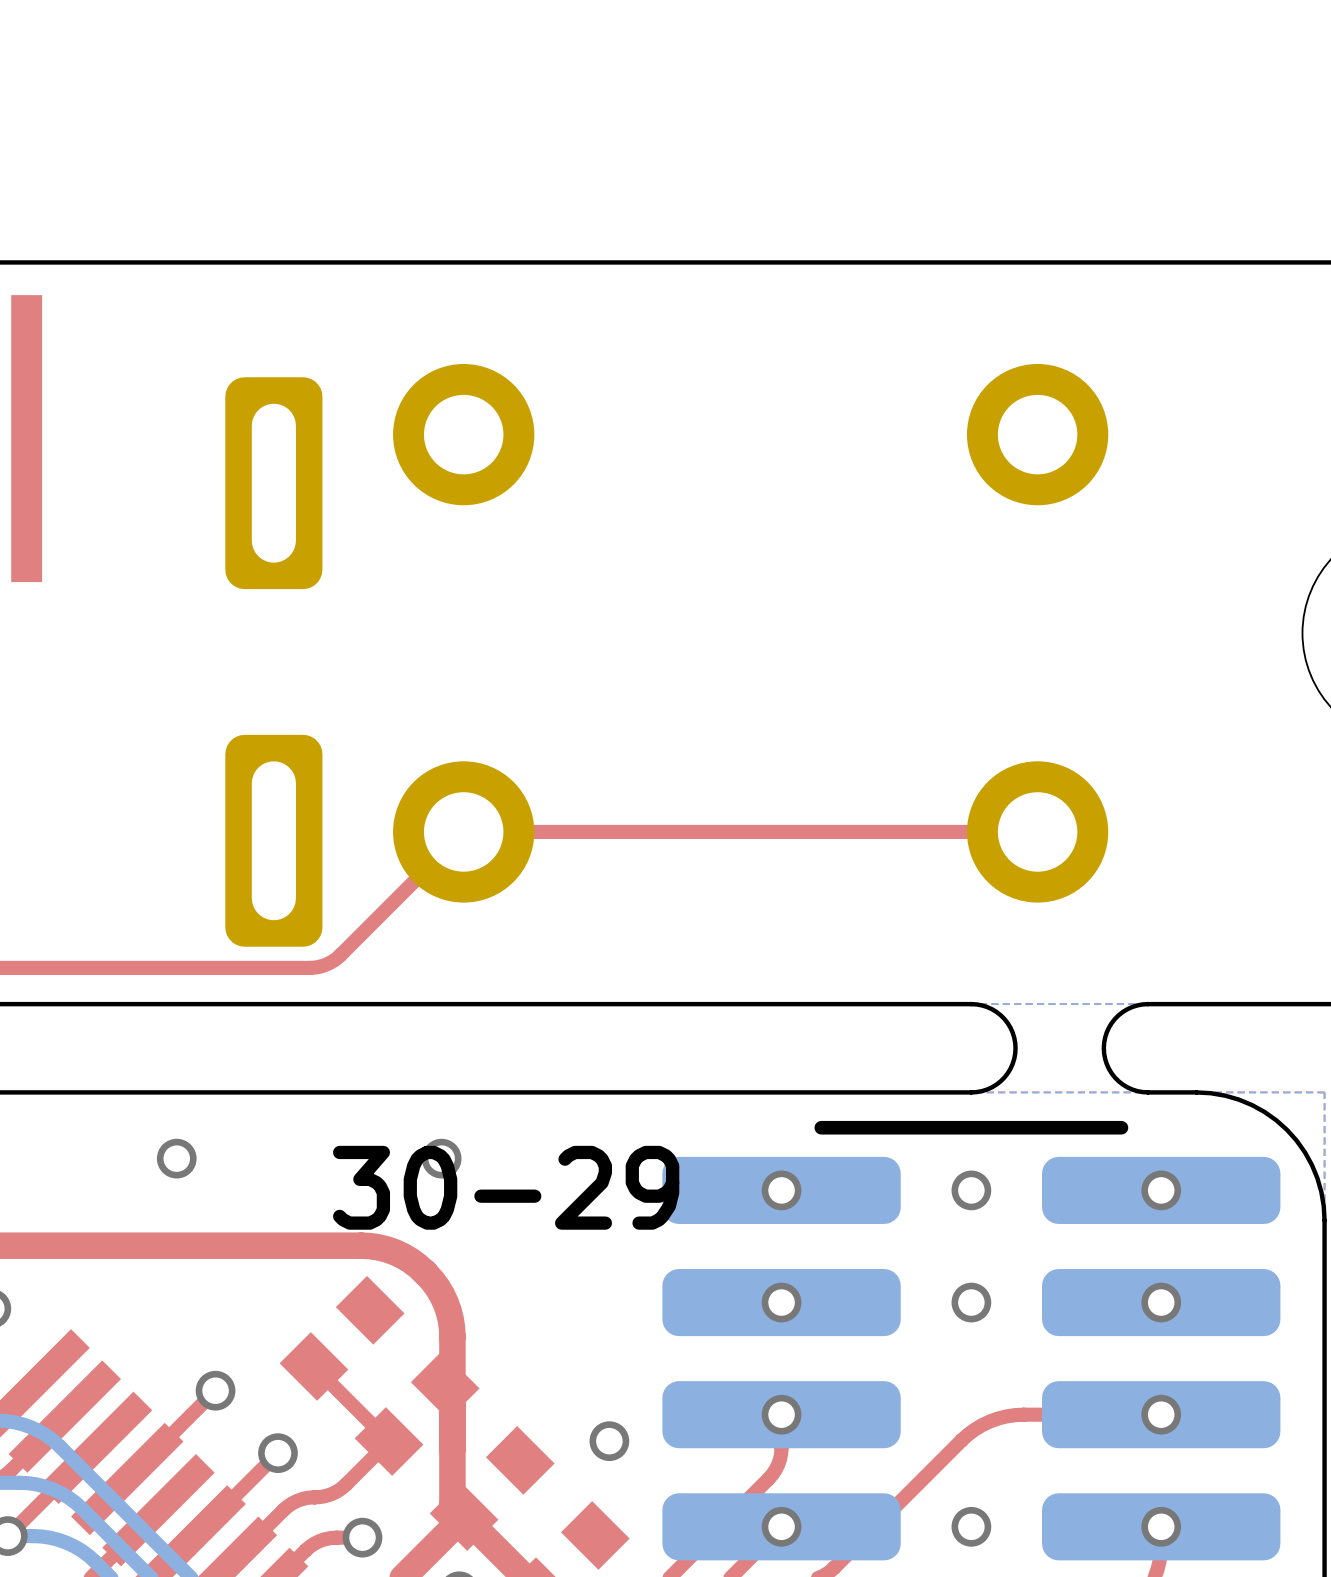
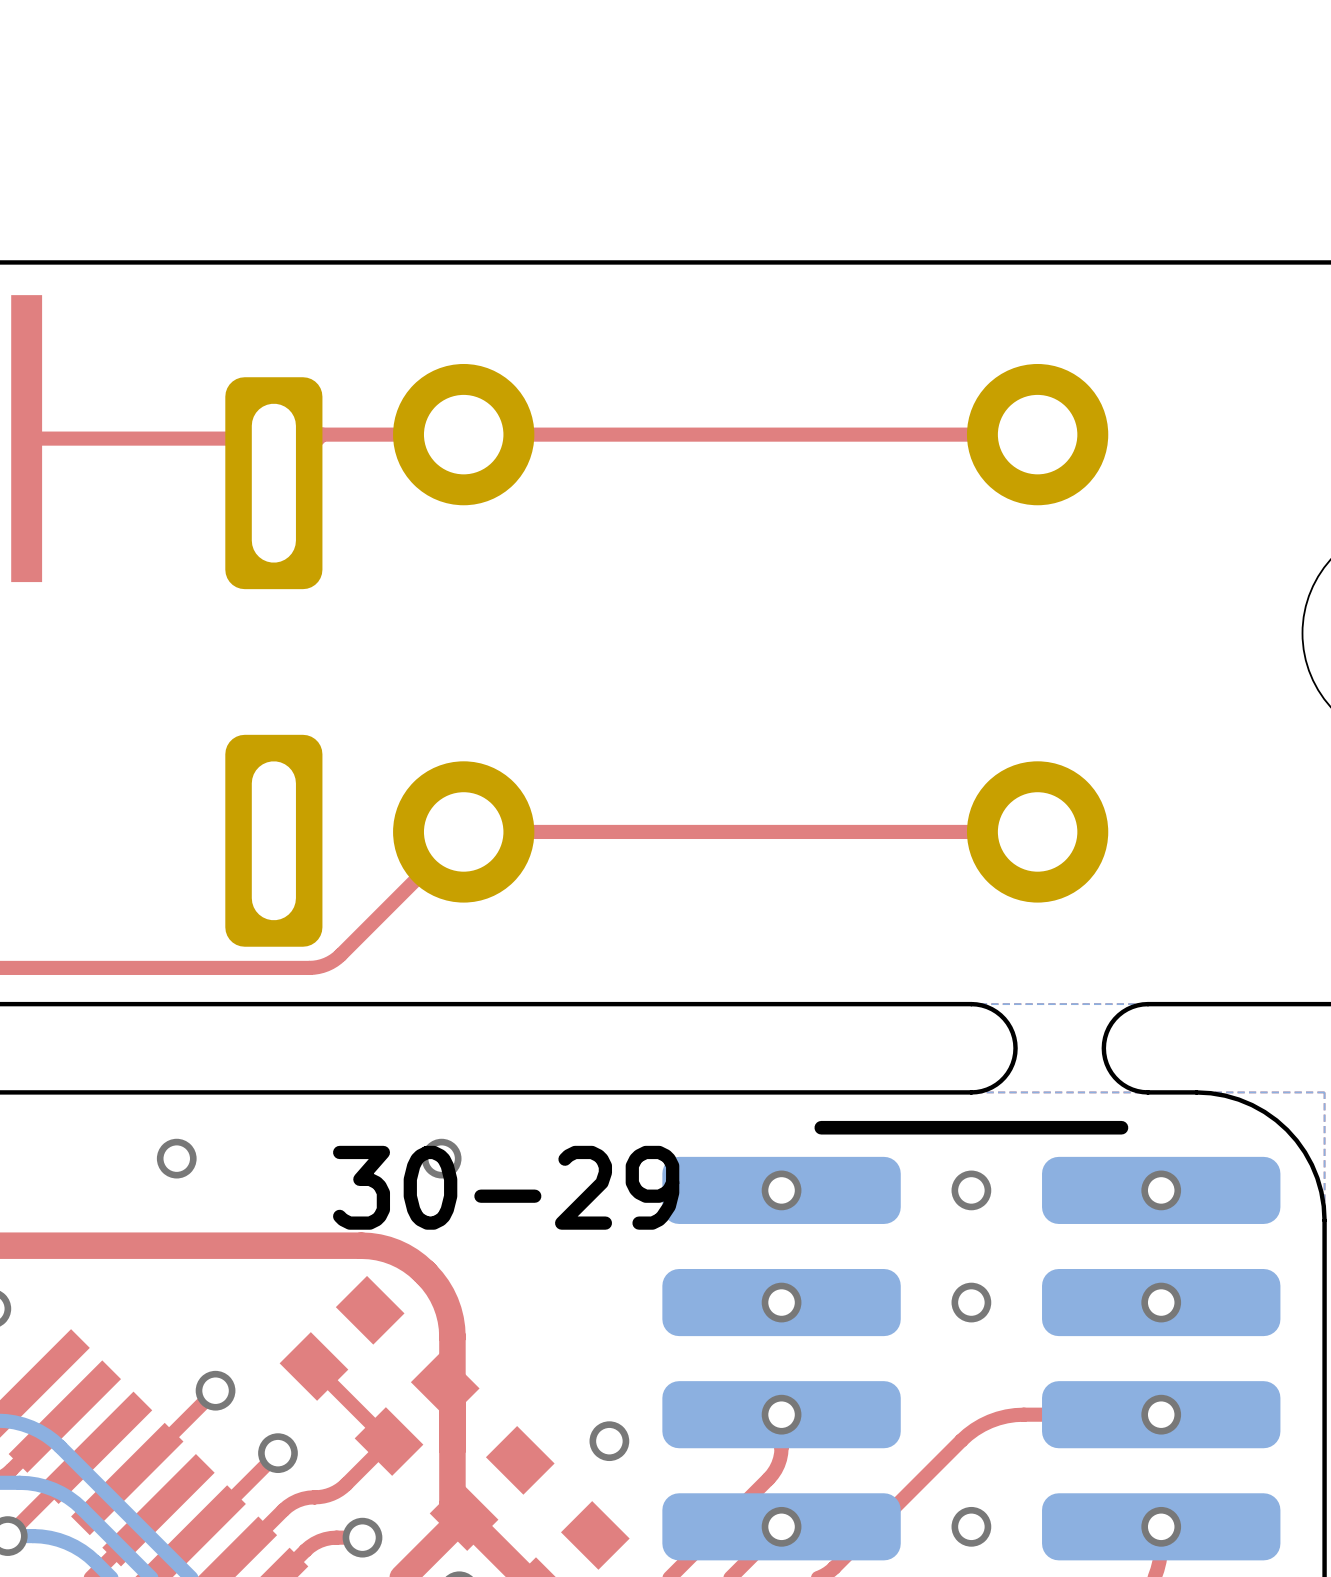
top track: none -> (1037, 434) (322, 434) (273, 483) (229, 438) (26, 438)

